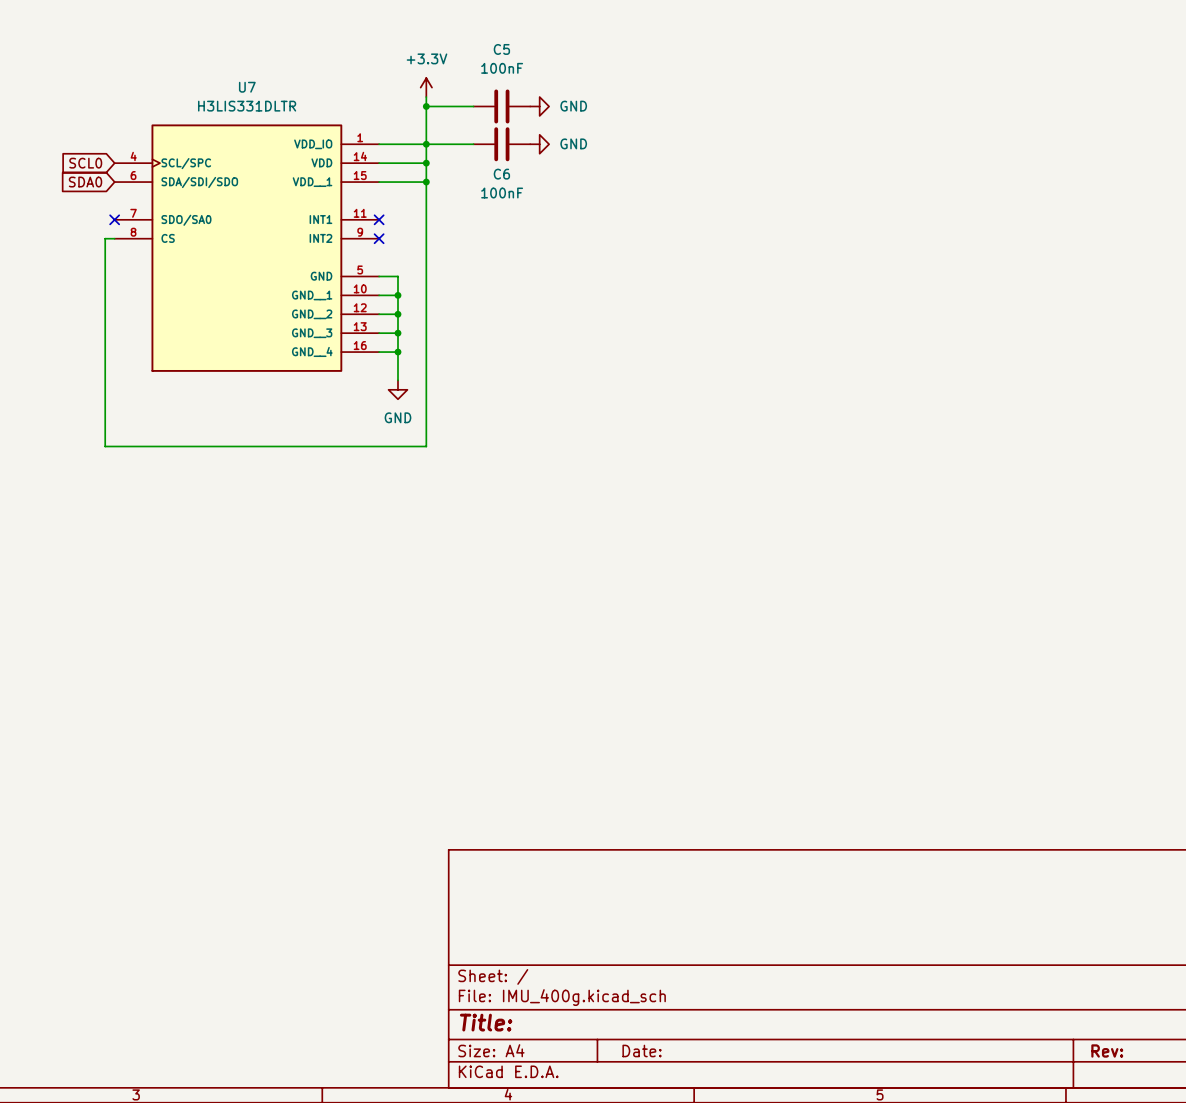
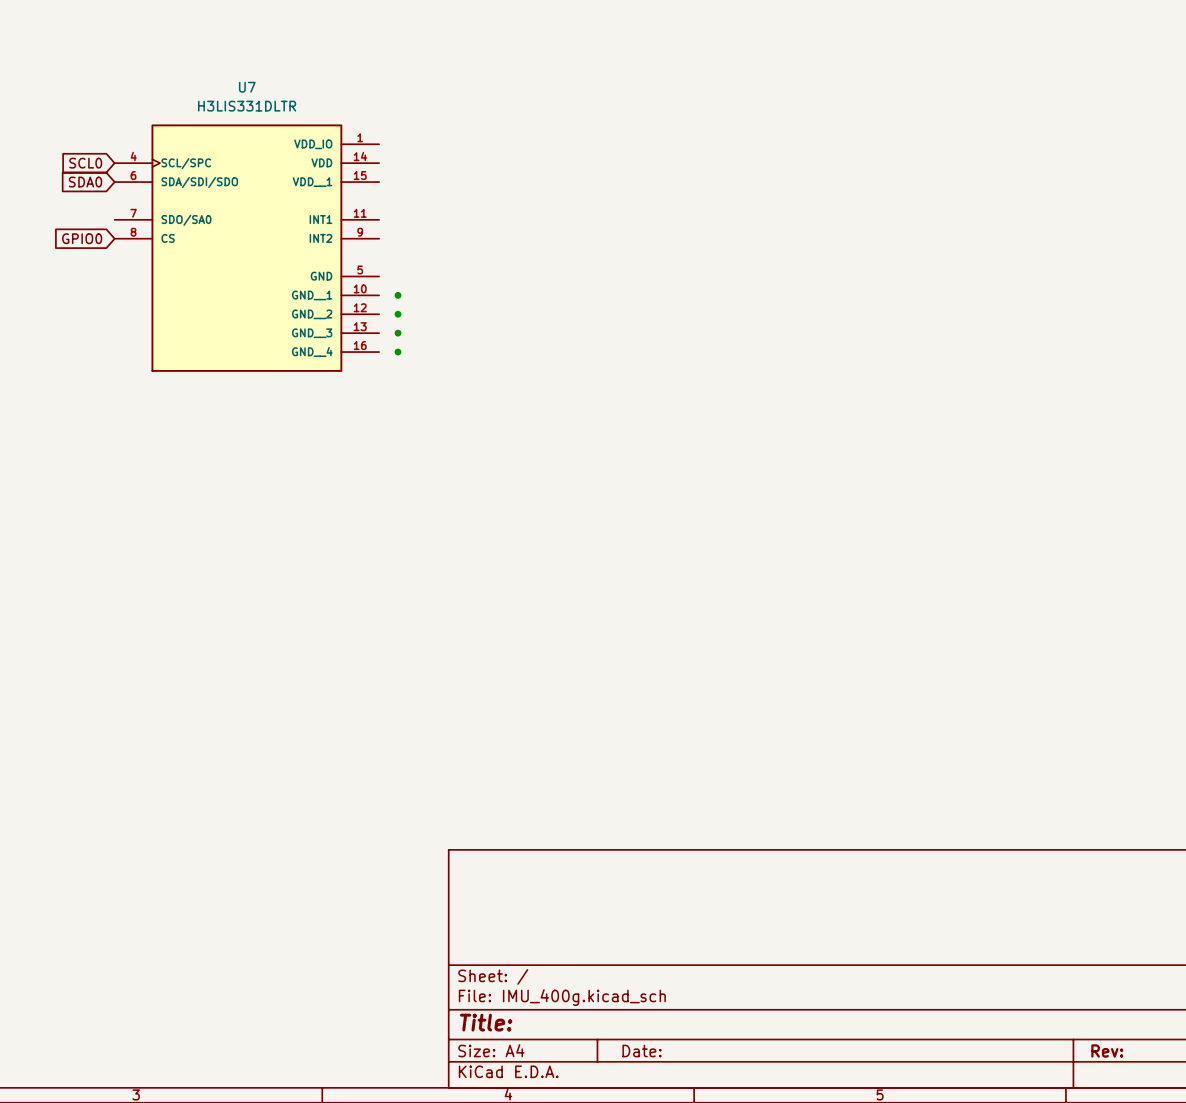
power symbol: +3.3V (426, 87) -> none
wire: (426, 97) (426, 446) (105, 446) (105, 238) (114, 238) -> none
wire: (426, 106) (473, 106) -> none
junction: (426, 106) -> none
C5: 100nF (501, 106) -> none
power symbol: GND (539, 106) -> none
wire: (379, 144) (473, 144) -> none
junction: (426, 144) -> none
C6: 100nF (501, 144) -> none
power symbol: GND (539, 144) -> none
wire: (379, 163) (426, 163) -> none
junction: (426, 163) -> none
wire: (379, 182) (426, 182) -> none
junction: (426, 182) -> none
no-connect mark: (114, 219) -> none
no-connect mark: (379, 219) -> none
global label: none -> GPIO0 (82, 238)
no-connect mark: (379, 238) -> none
wire: (379, 276) (397, 276) (397, 380) -> none
wire: (379, 295) (397, 295) -> none
wire: (379, 314) (397, 314) -> none
wire: (379, 333) (397, 333) -> none
wire: (379, 352) (397, 352) -> none
power symbol: GND (397, 389) -> none

